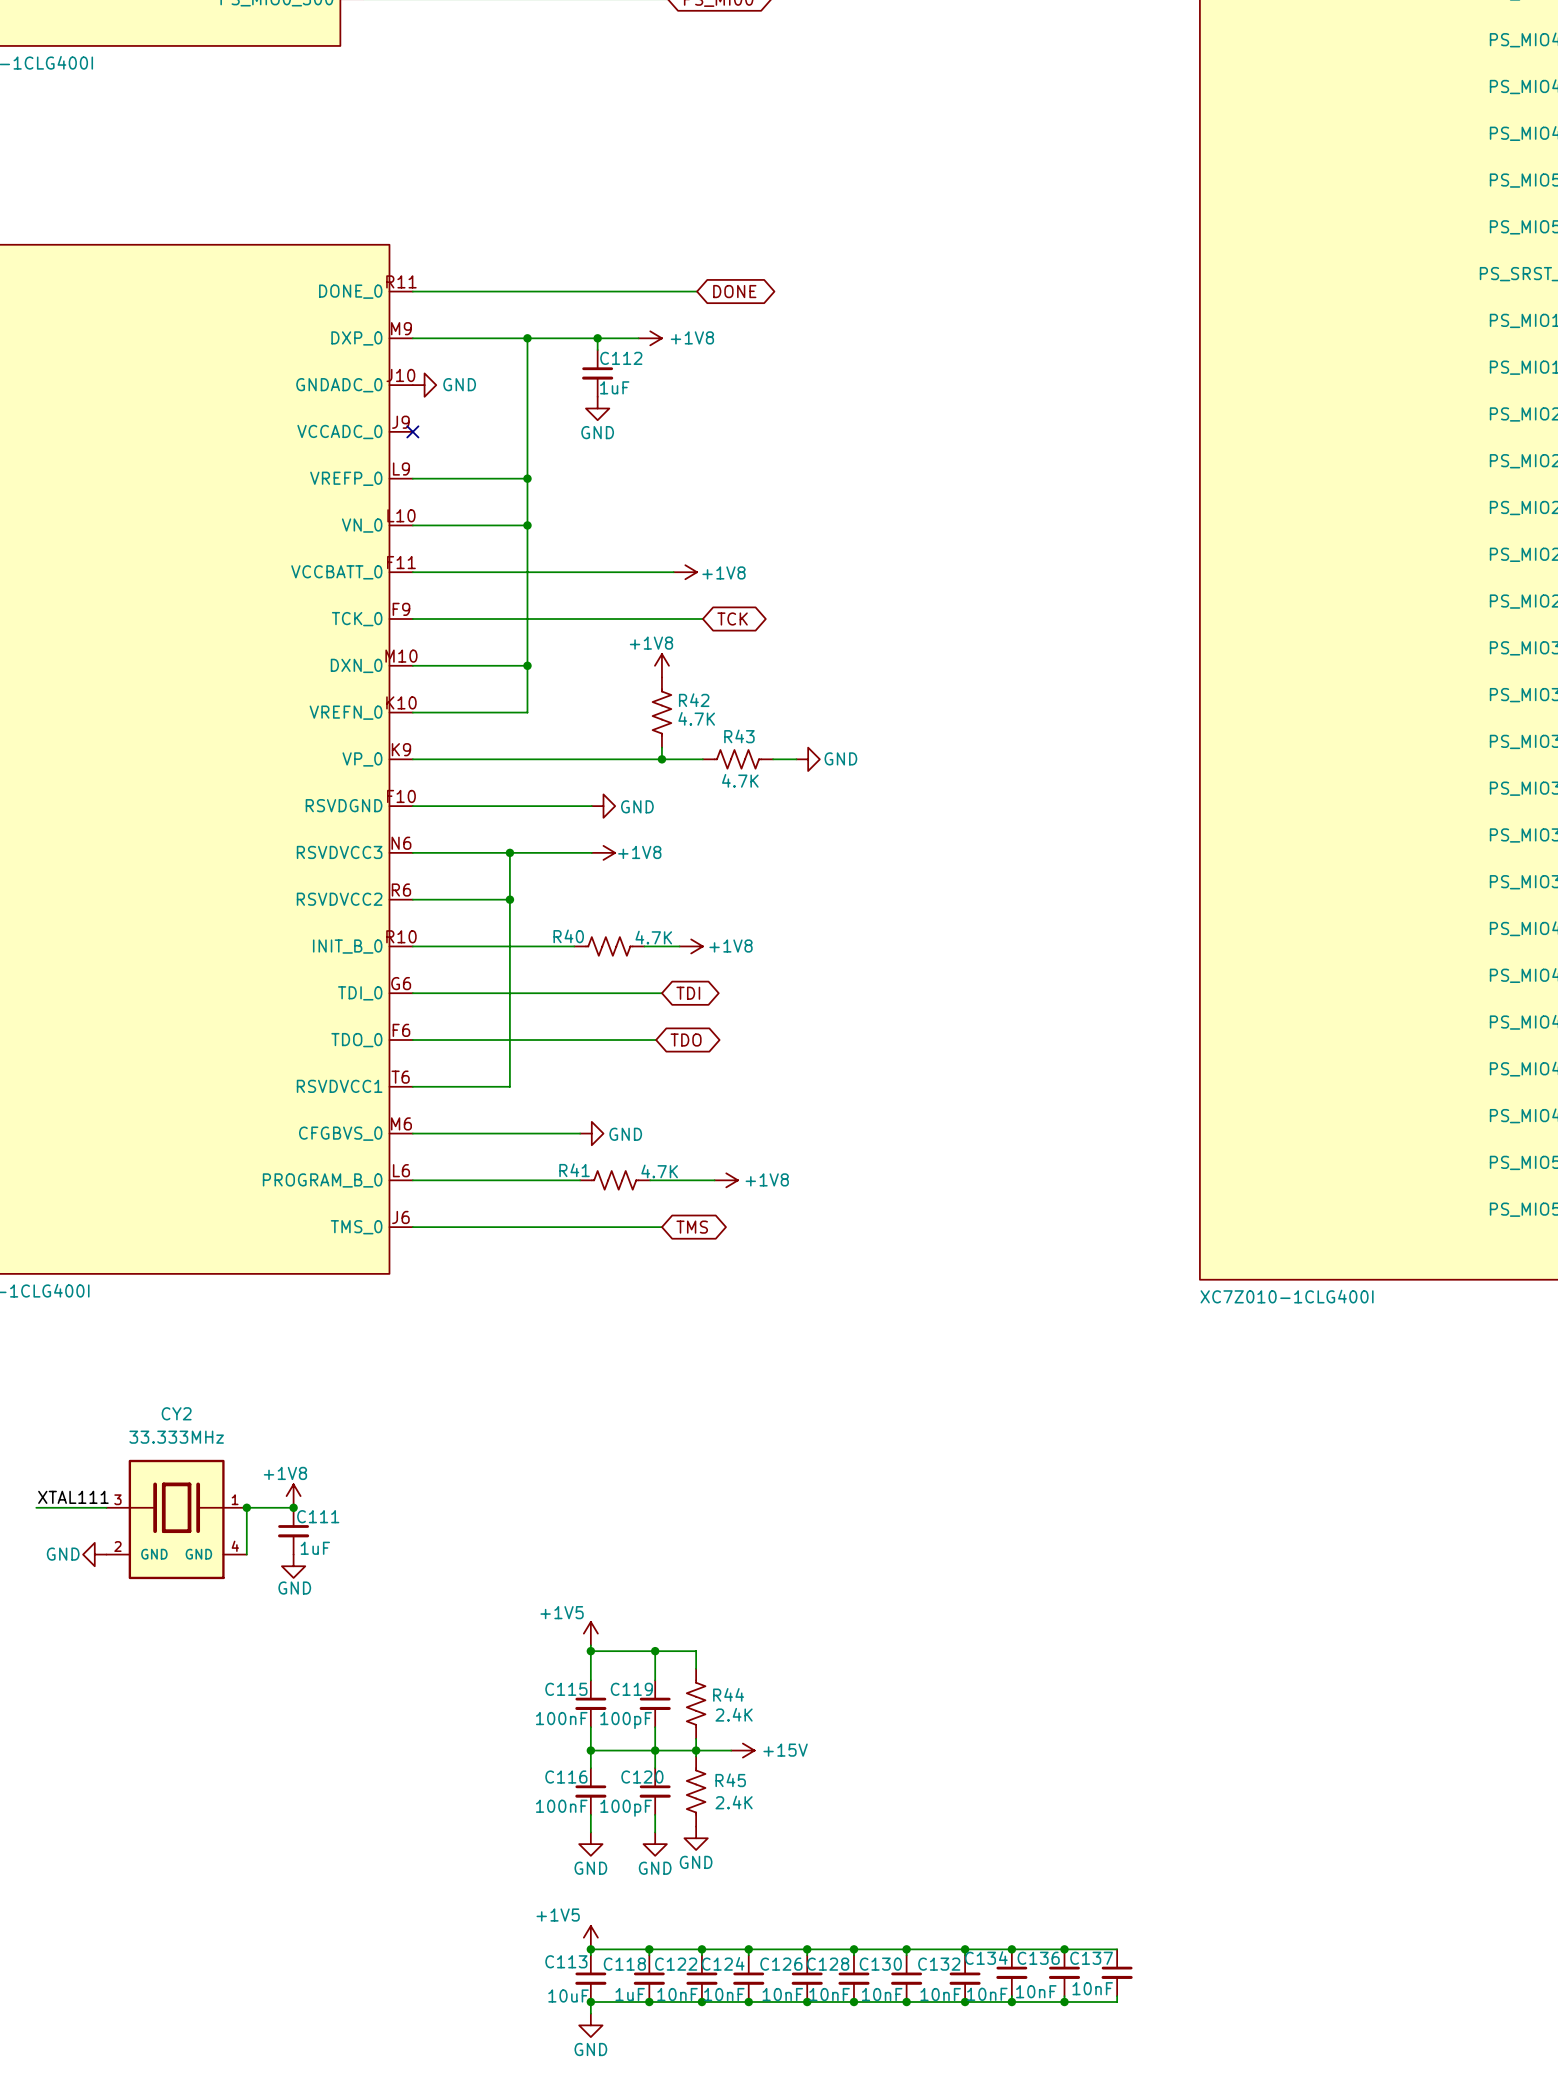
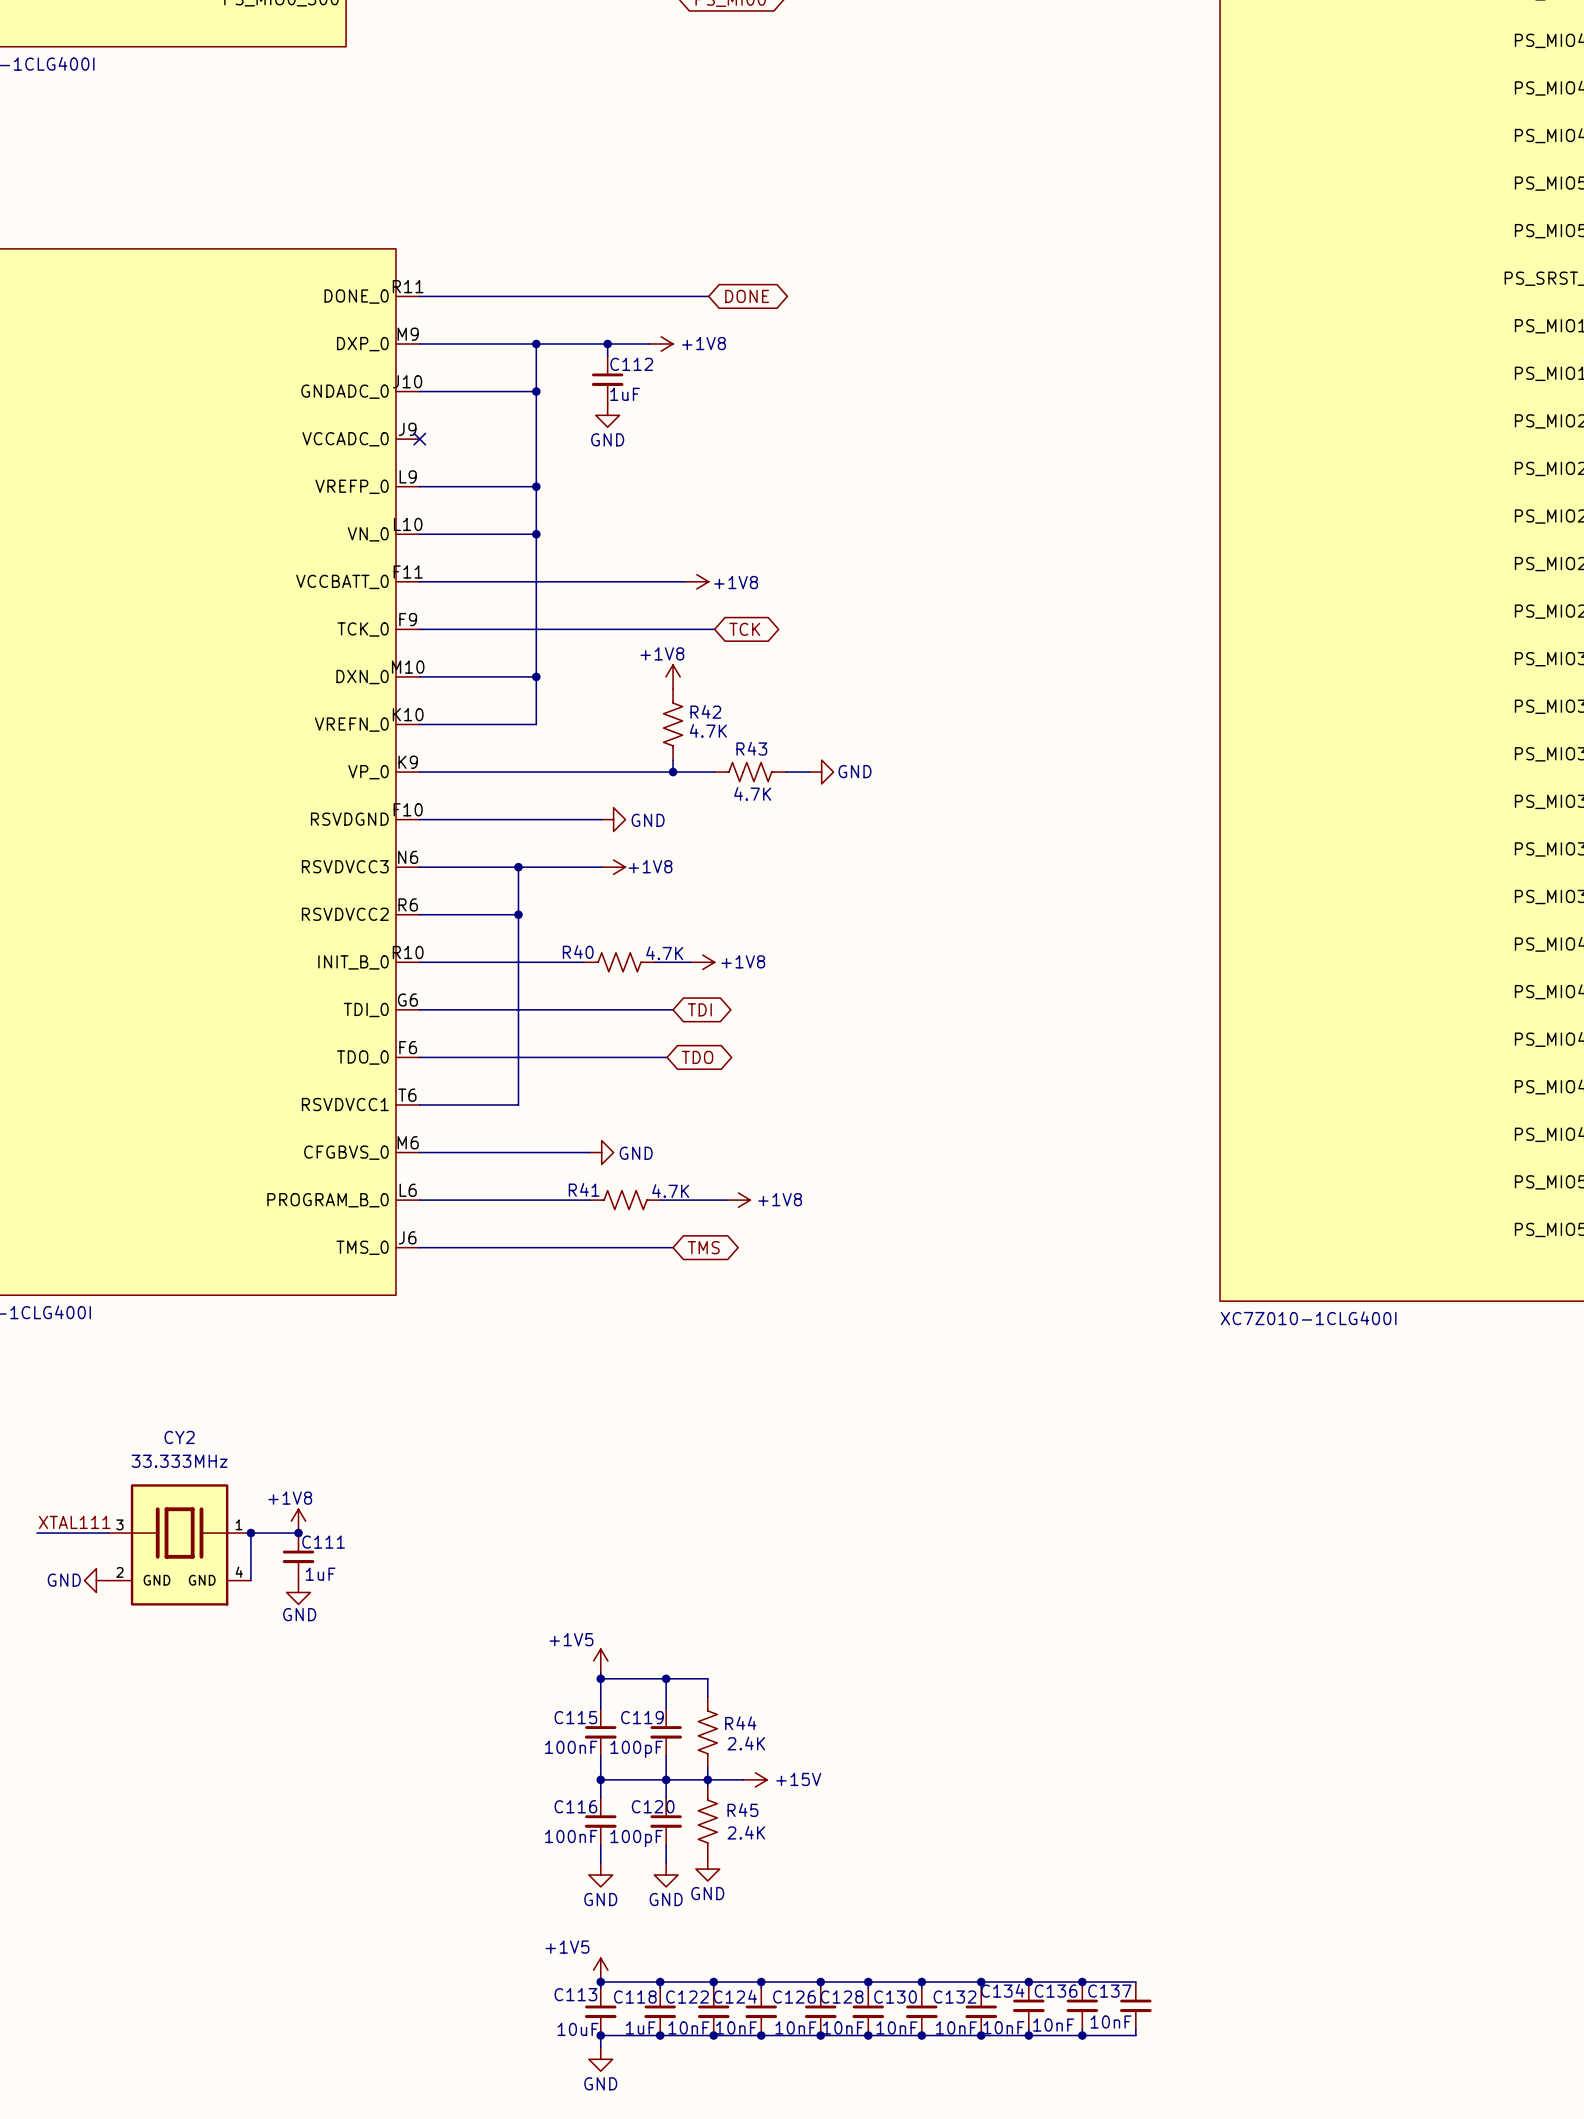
wire: none -> (419, 391) (536, 391)
power symbol: GND (424, 385) -> none
junction: none -> (536, 391)

